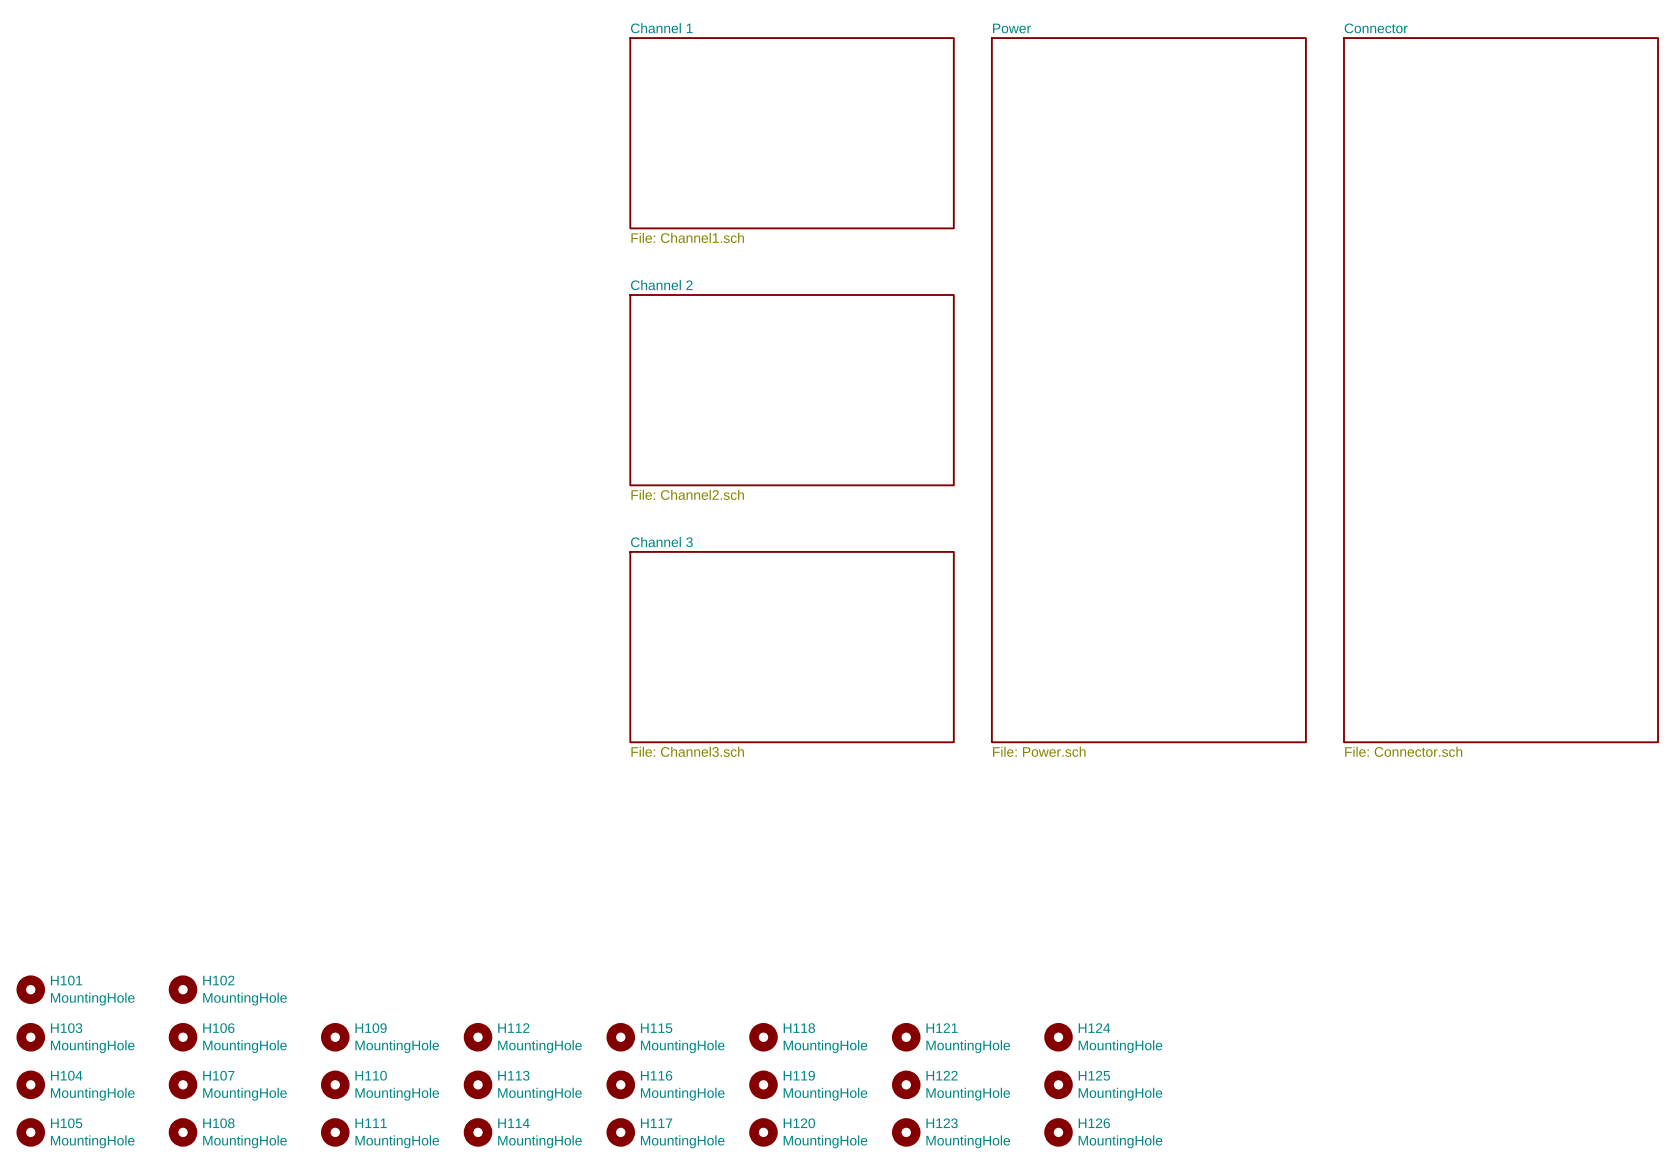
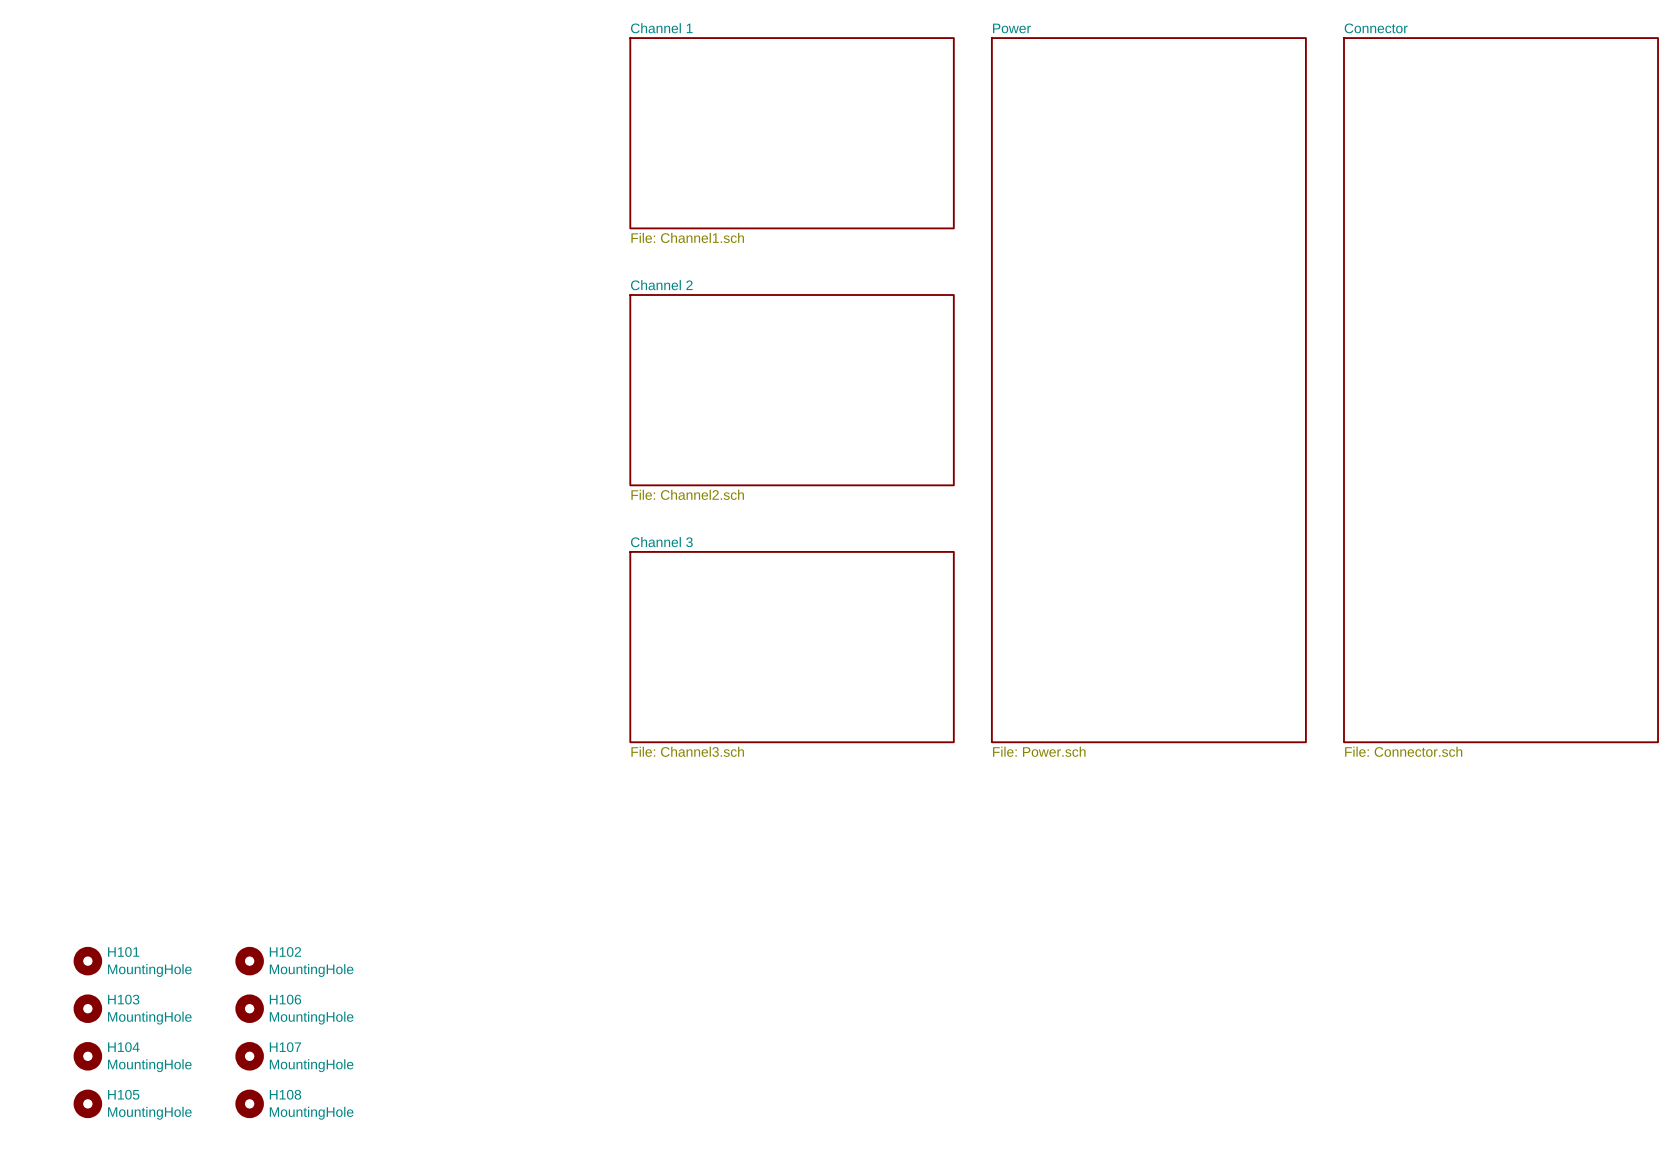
H101 position: (30, 989) -> (87, 961)
H102 position: (183, 989) -> (249, 961)
H103 position: (30, 1037) -> (87, 1008)
H106 position: (183, 1037) -> (249, 1008)
H109: MountingHole (335, 1037) -> none
H112: MountingHole (478, 1037) -> none
H115: MountingHole (620, 1037) -> none
H118: MountingHole (763, 1037) -> none
H121: MountingHole (906, 1037) -> none
H124: MountingHole (1058, 1037) -> none
H104 position: (30, 1084) -> (87, 1056)
H107 position: (183, 1084) -> (249, 1056)
H110: MountingHole (335, 1084) -> none
H113: MountingHole (478, 1084) -> none
H116: MountingHole (620, 1084) -> none
H119: MountingHole (763, 1084) -> none
H122: MountingHole (906, 1084) -> none
H125: MountingHole (1058, 1084) -> none
H105 position: (30, 1132) -> (87, 1103)
H108 position: (183, 1132) -> (249, 1103)
H111: MountingHole (335, 1132) -> none
H114: MountingHole (478, 1132) -> none
H117: MountingHole (620, 1132) -> none
H120: MountingHole (763, 1132) -> none
H123: MountingHole (906, 1132) -> none
H126: MountingHole (1058, 1132) -> none

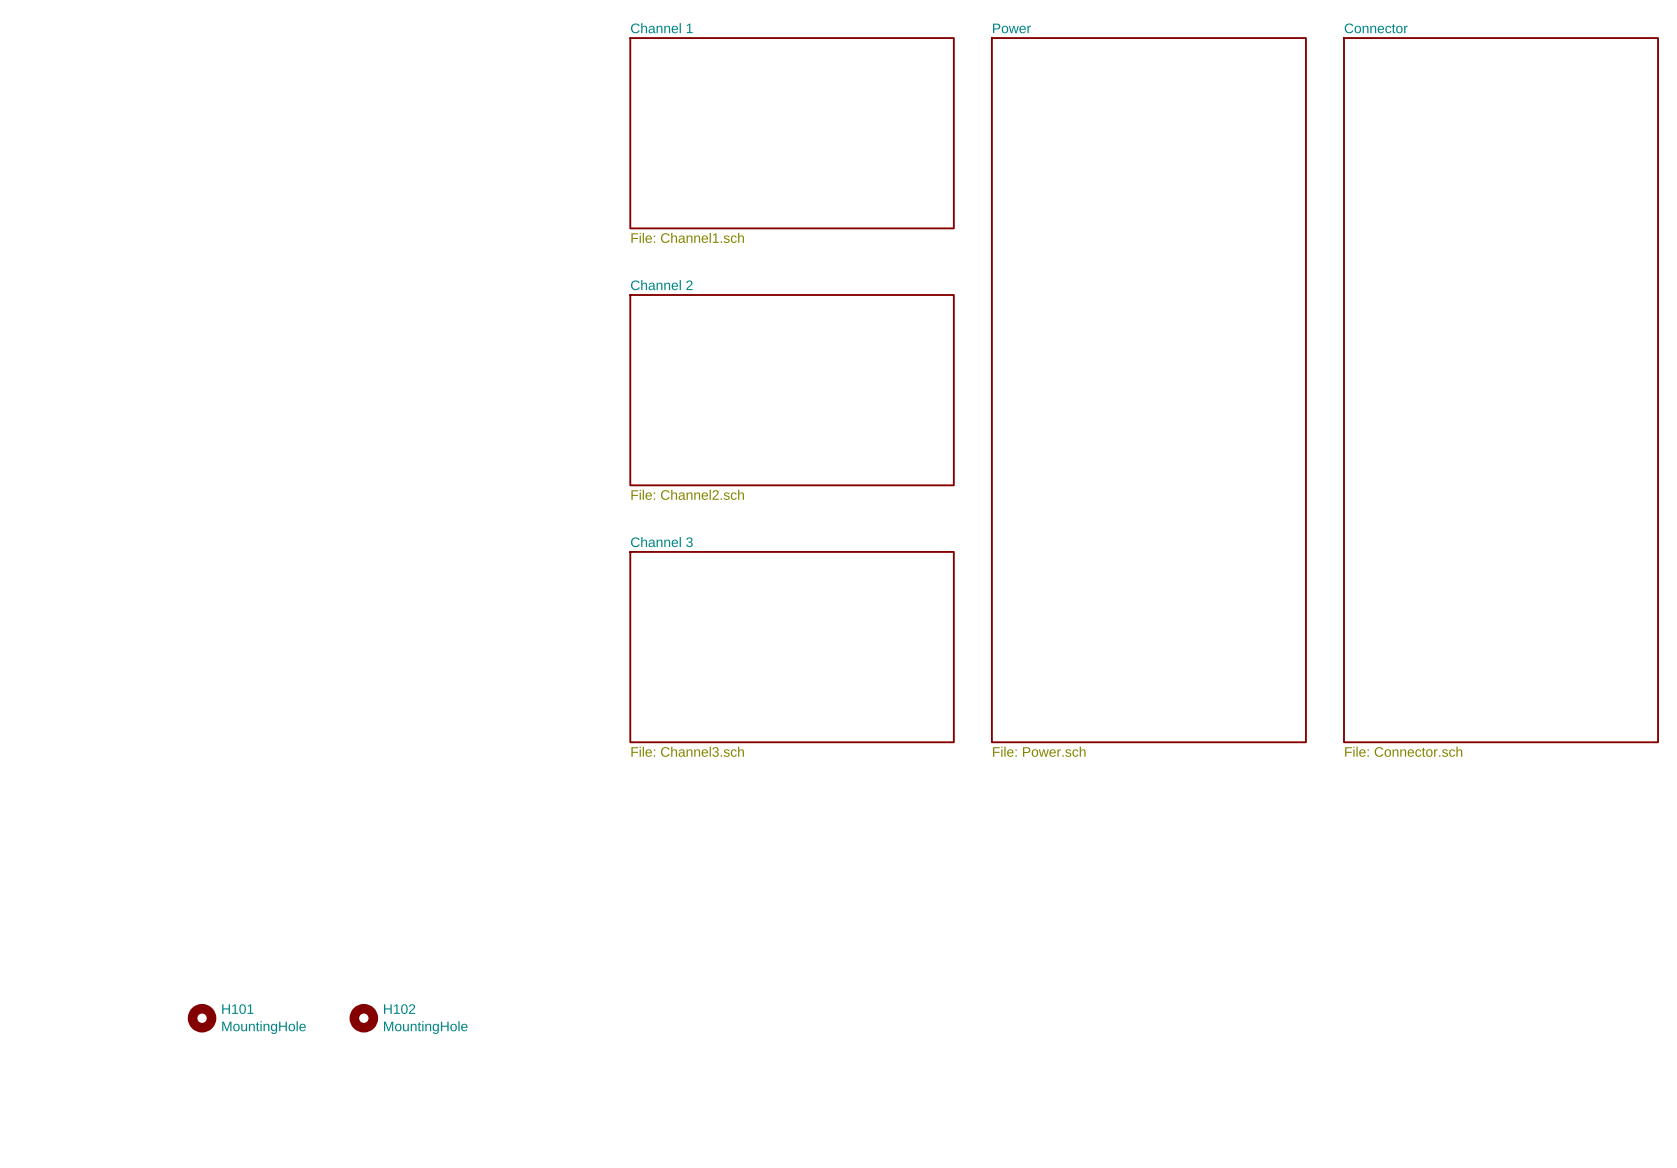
H101 position: (87, 961) -> (202, 1018)
H102 position: (249, 961) -> (363, 1018)
H103: MountingHole (87, 1008) -> none
H106: MountingHole (249, 1008) -> none
H104: MountingHole (87, 1056) -> none
H107: MountingHole (249, 1056) -> none
H105: MountingHole (87, 1103) -> none
H108: MountingHole (249, 1103) -> none

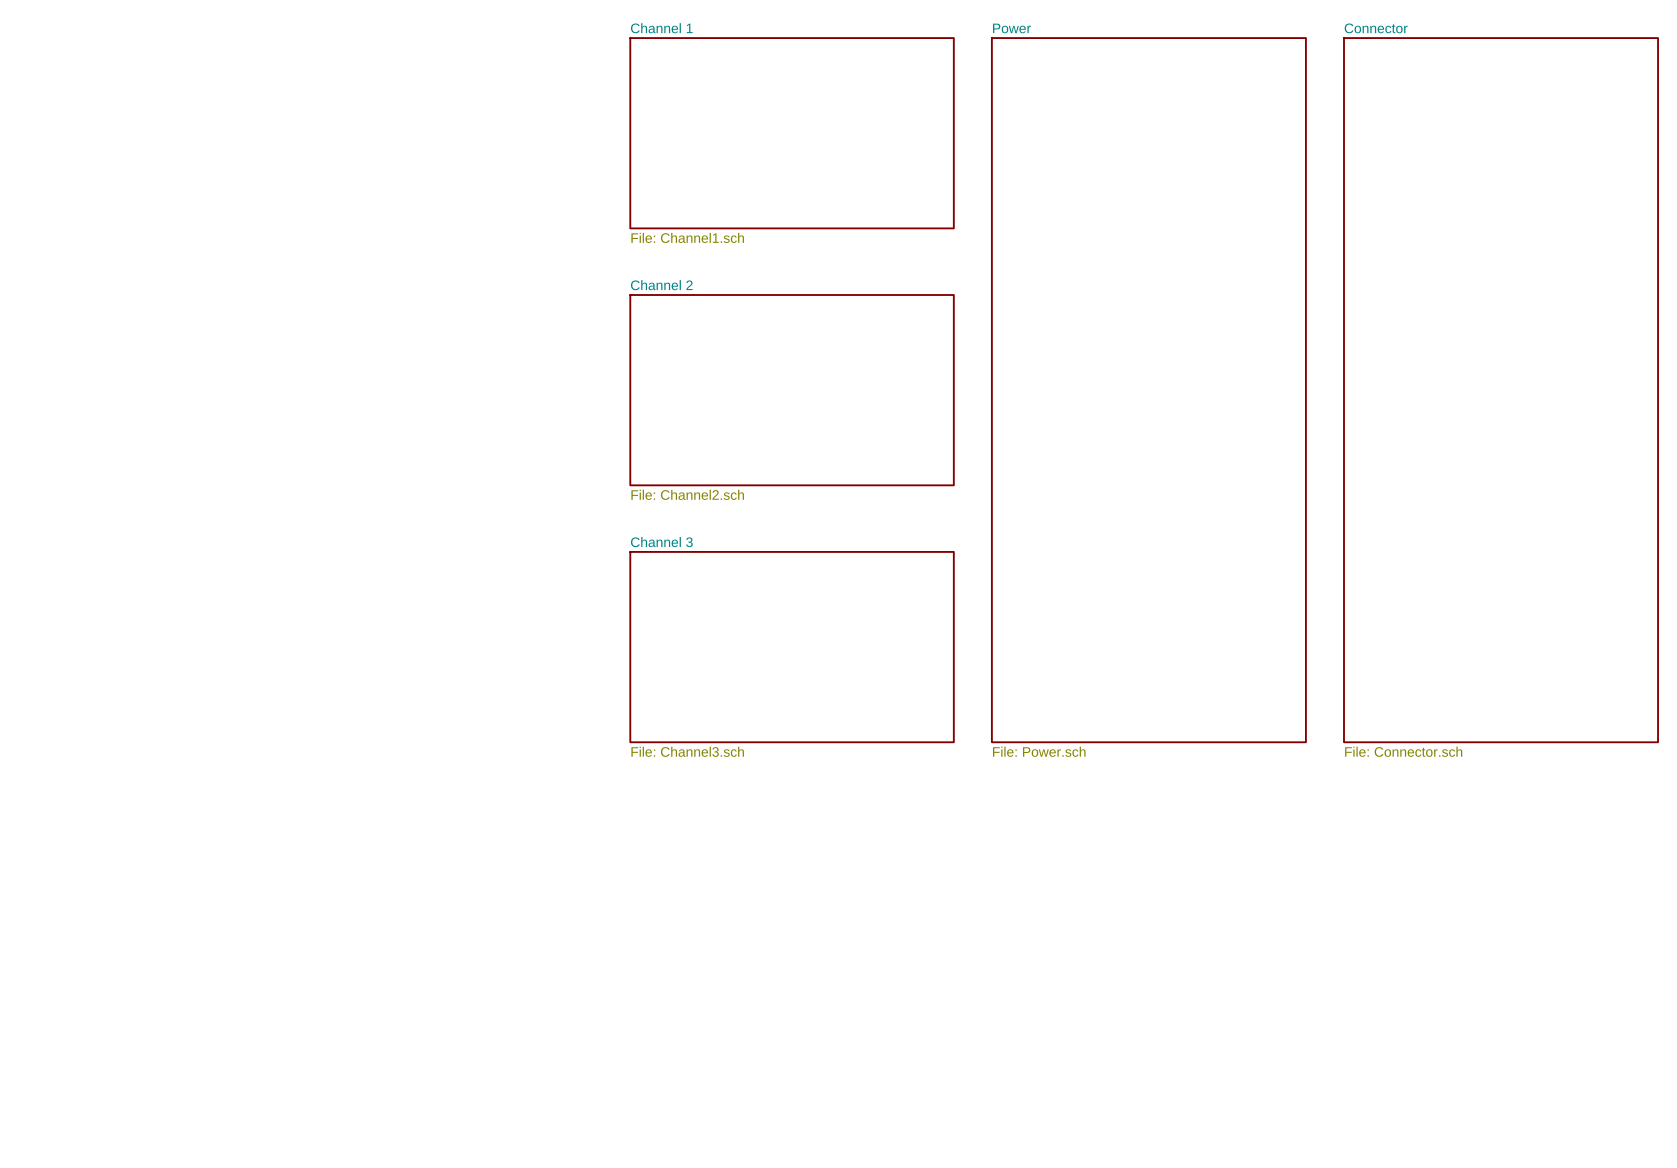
H101: MountingHole (202, 1018) -> none
H102: MountingHole (363, 1018) -> none

